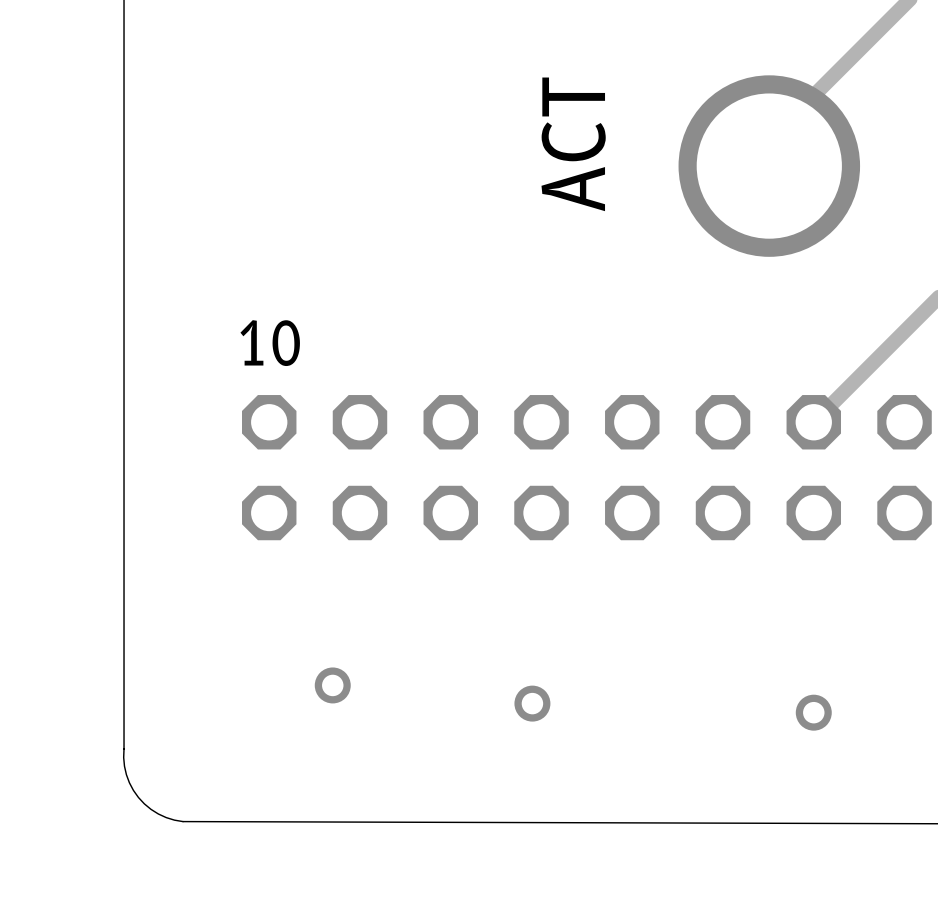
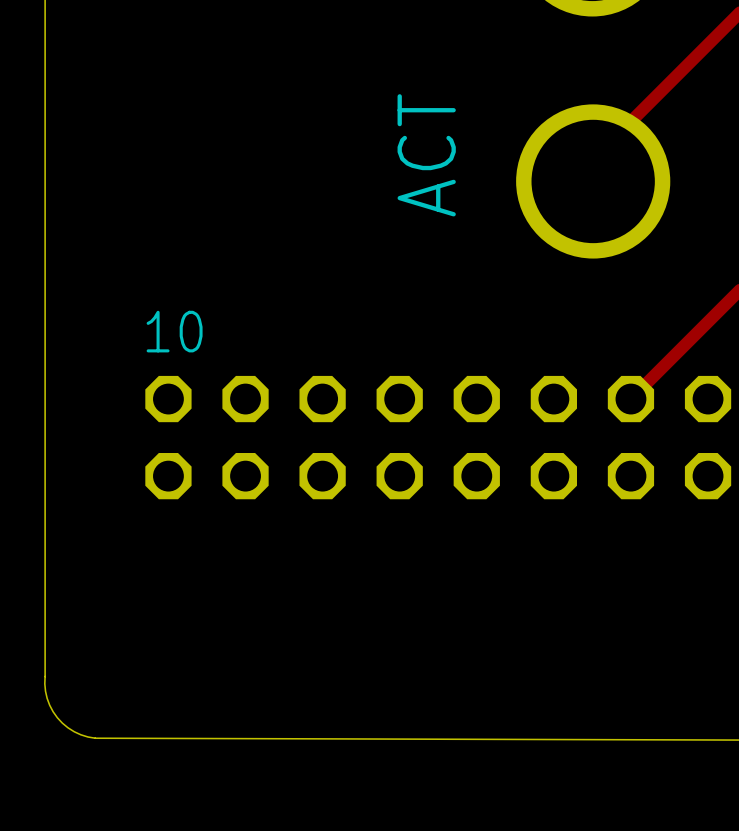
via: (332, 685) -> none
via: (532, 703) -> none
via: (813, 712) -> none

